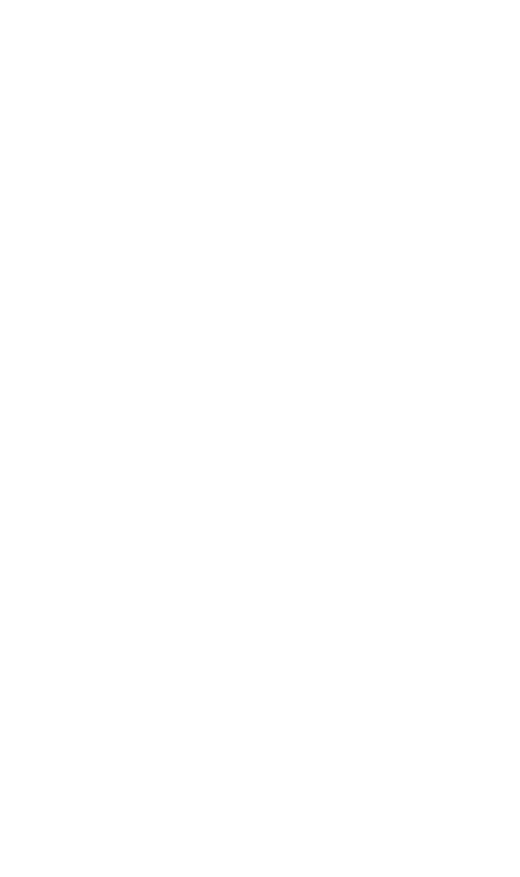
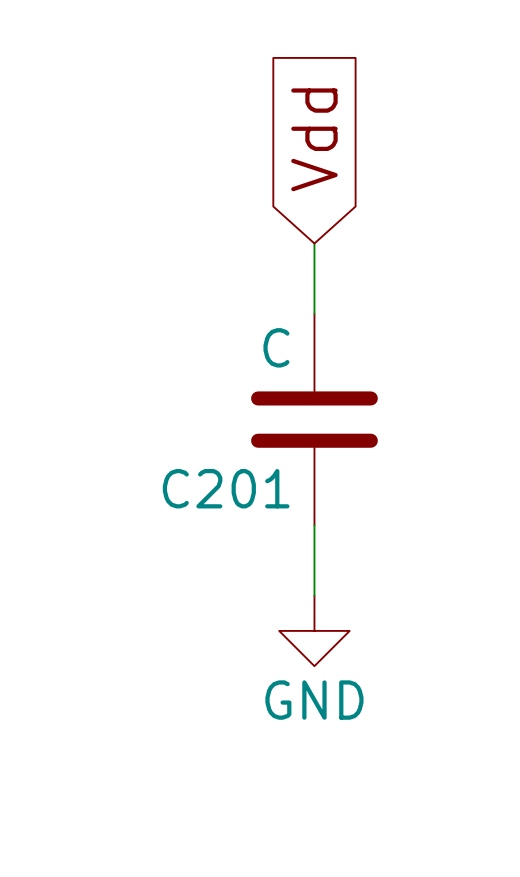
global label: none -> Vdd (314, 139)
wire: none -> (314, 243) (314, 313)
C201: none -> C (314, 419)
wire: none -> (314, 525) (314, 595)
power symbol: none -> GND (314, 630)

